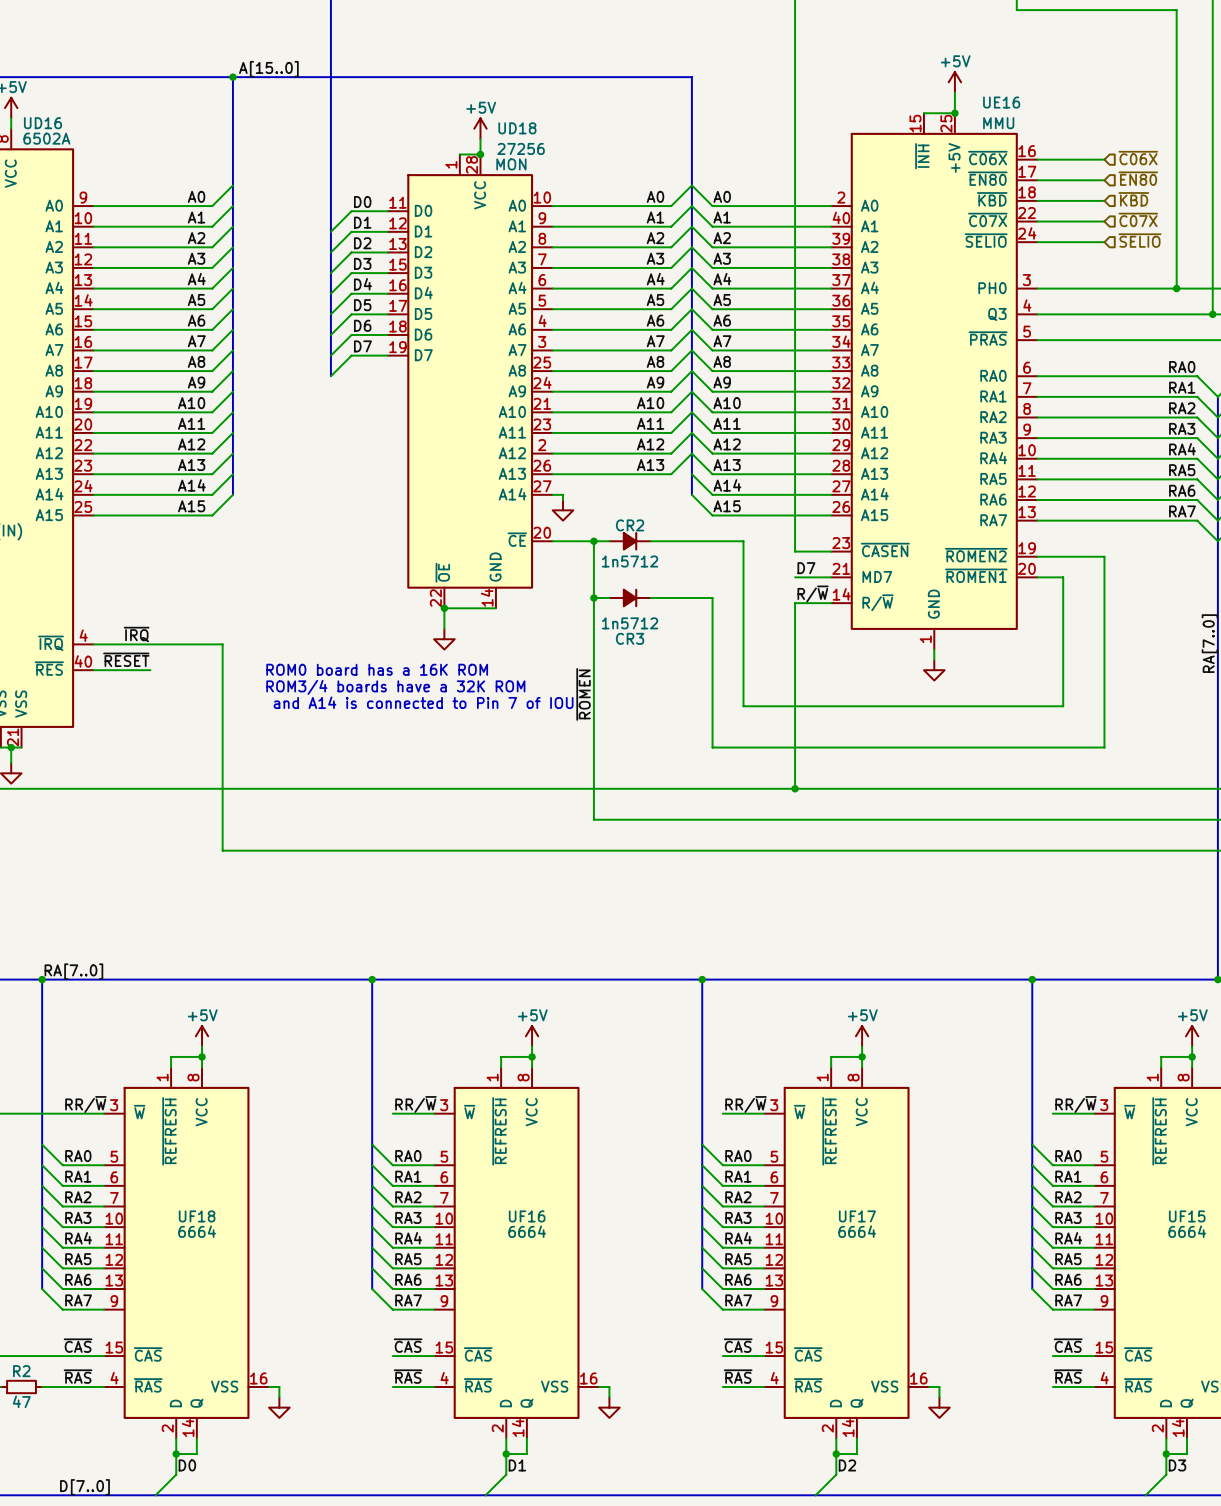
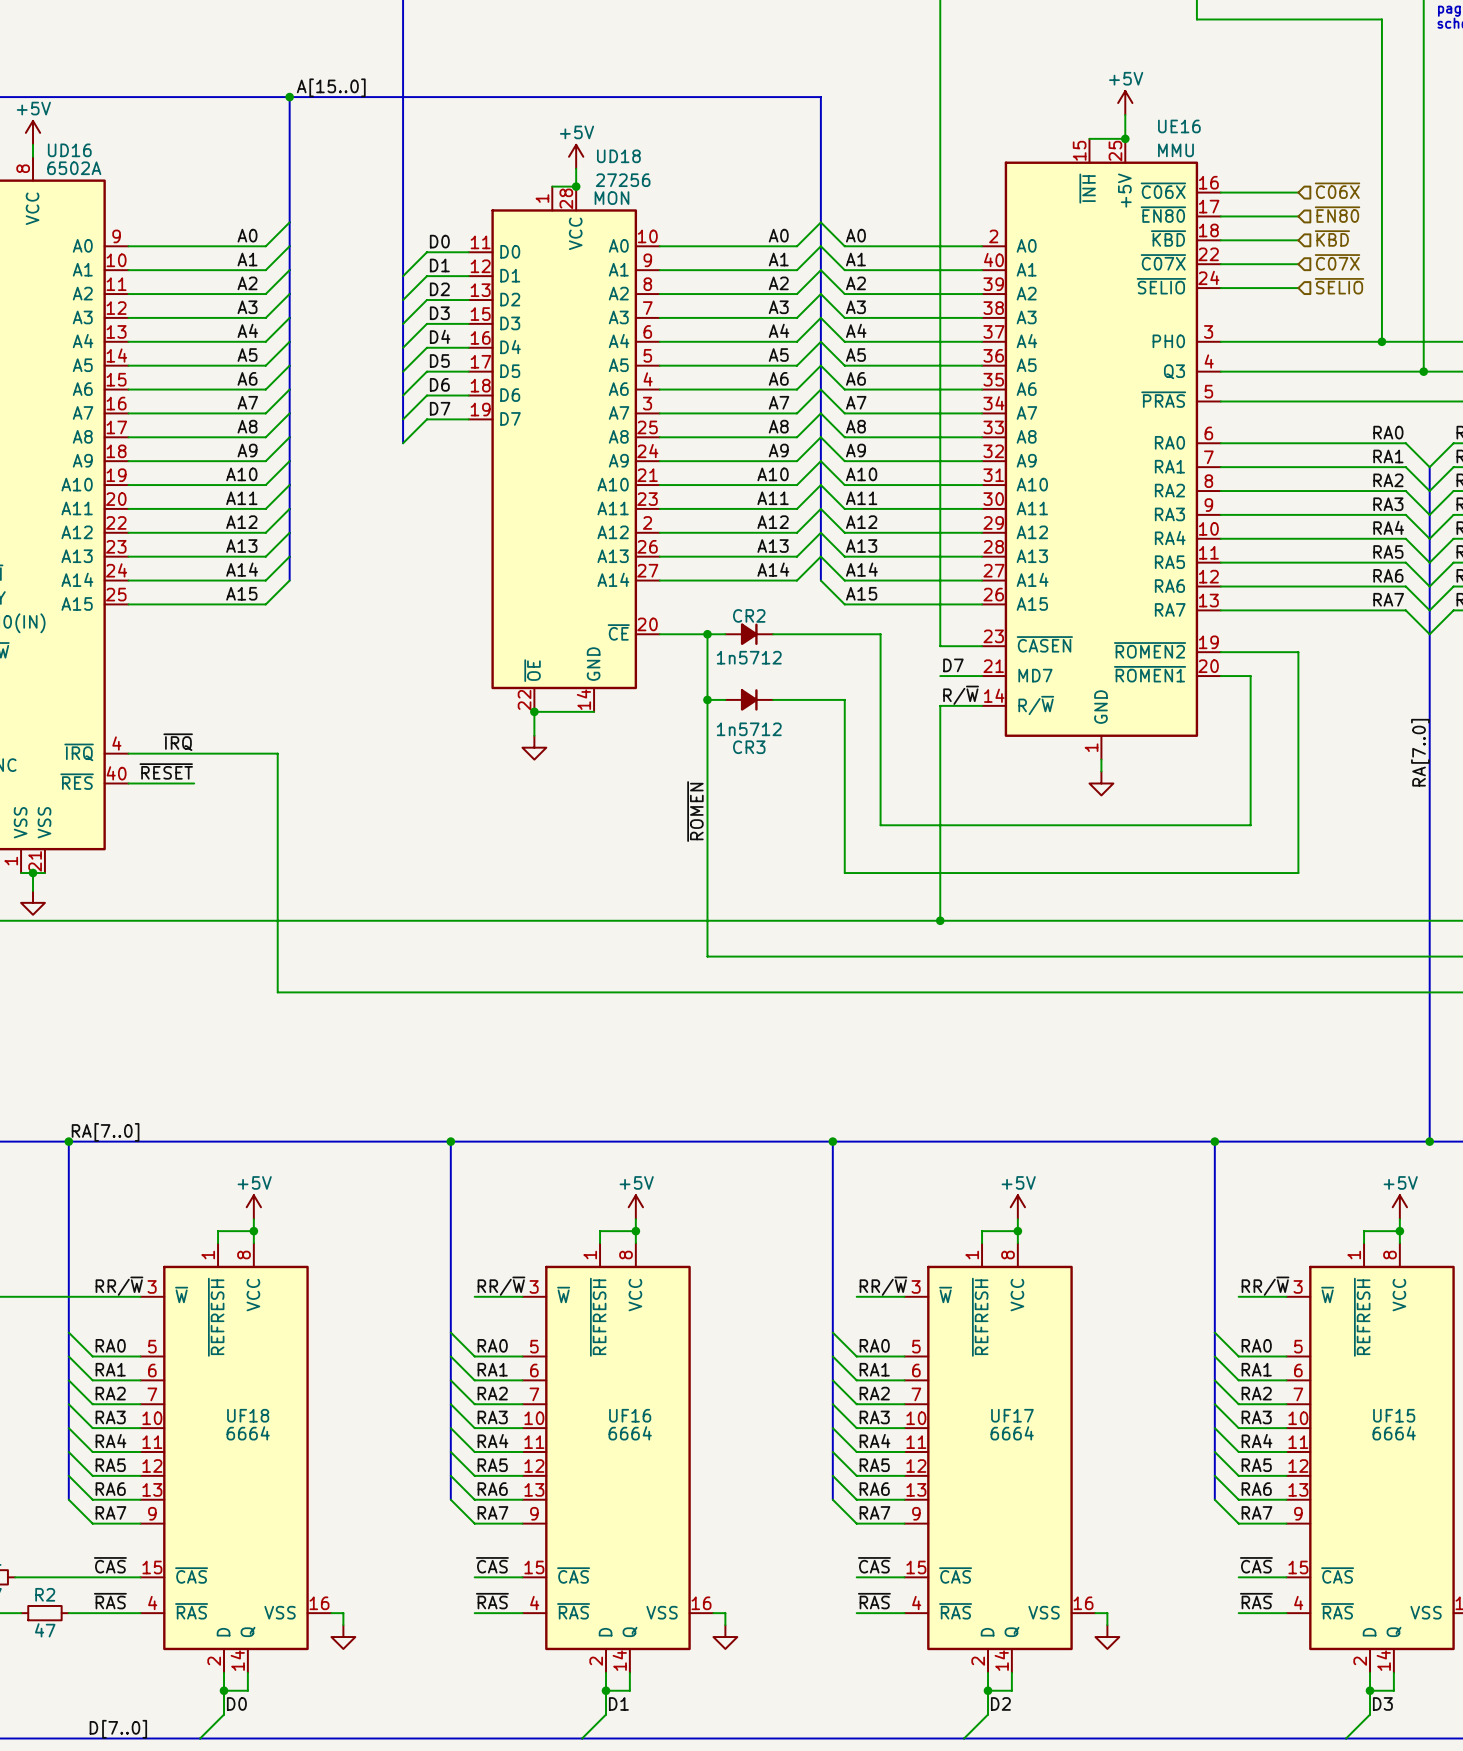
label: none -> A14 (773, 569)
wire: (563, 494) (563, 500) -> (671, 580) (797, 580) (820, 556)
power symbol: (563, 510) -> none
text: ROM0 board has a 16K ROM (377, 669) -> none
text: ROM3/4 boards have a 32K ROM (395, 687) -> none
text: and A14 is connected to Pin 7 of IOU (423, 702) -> none

